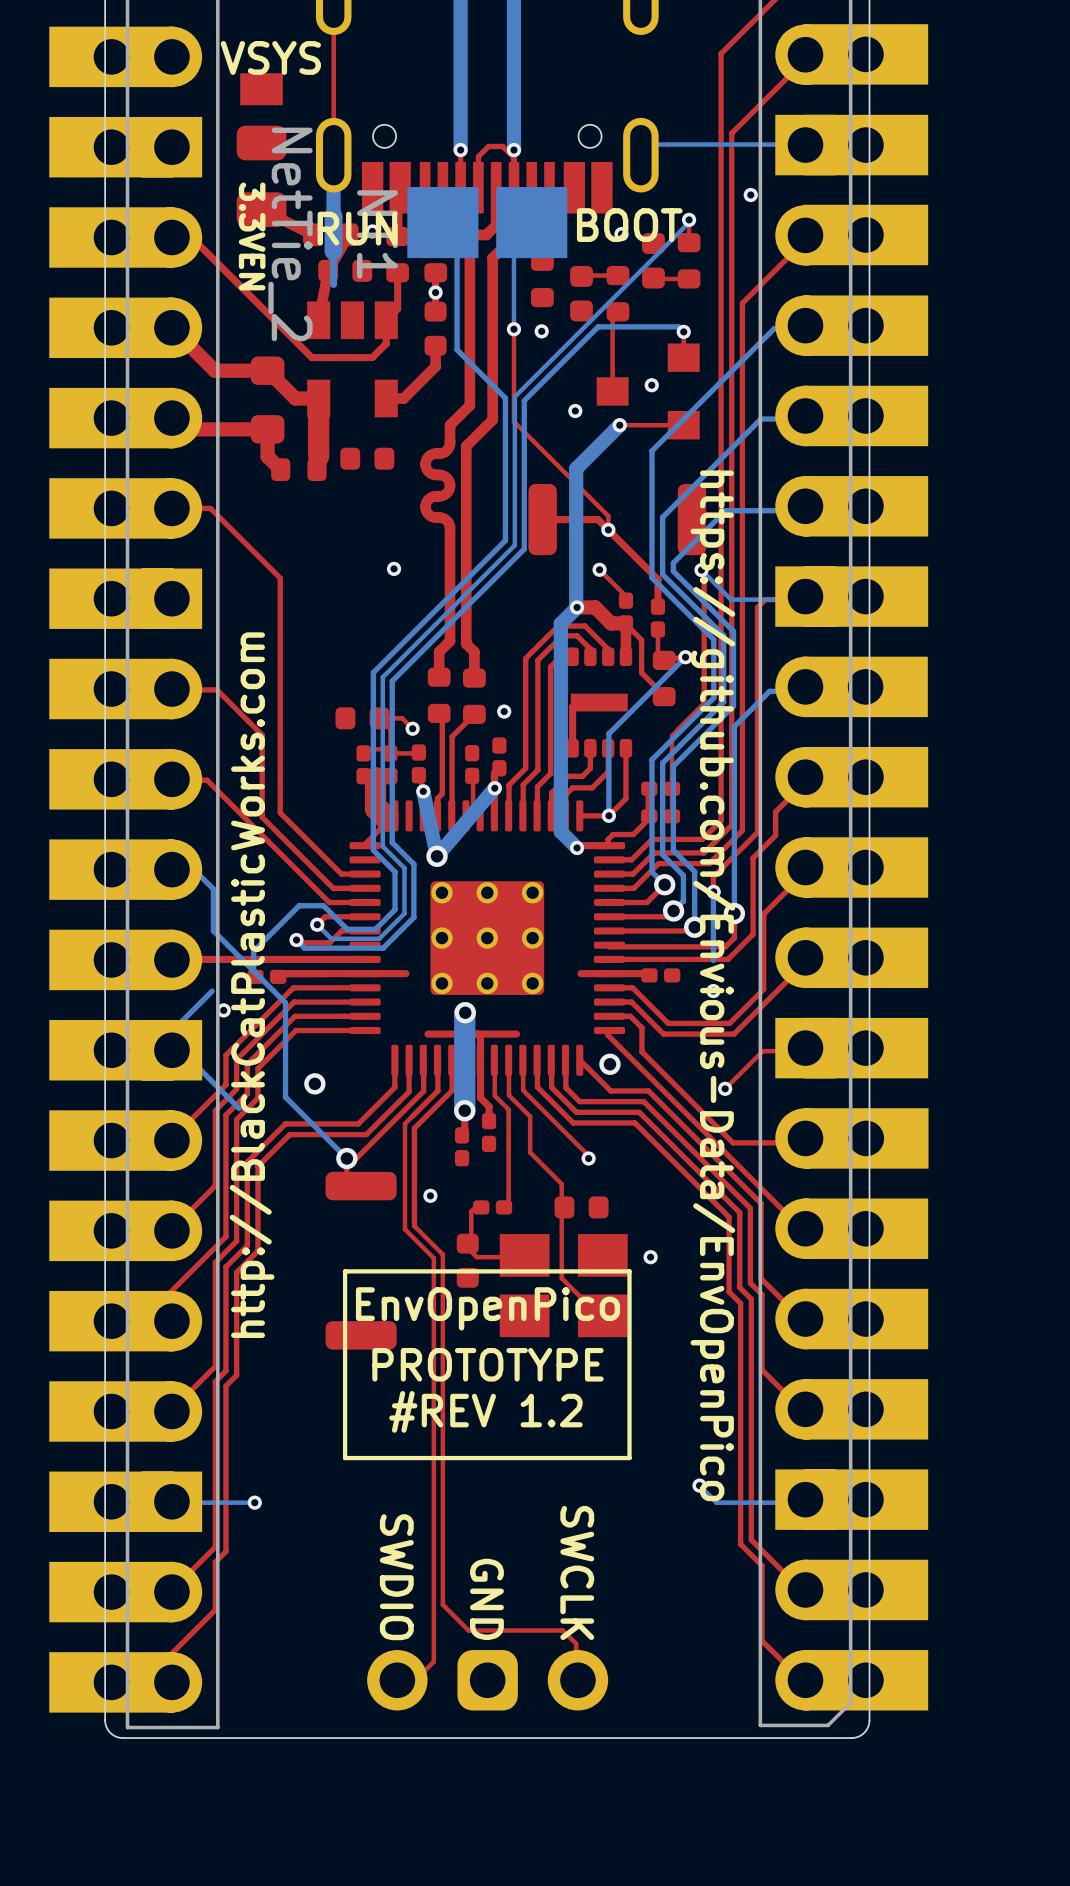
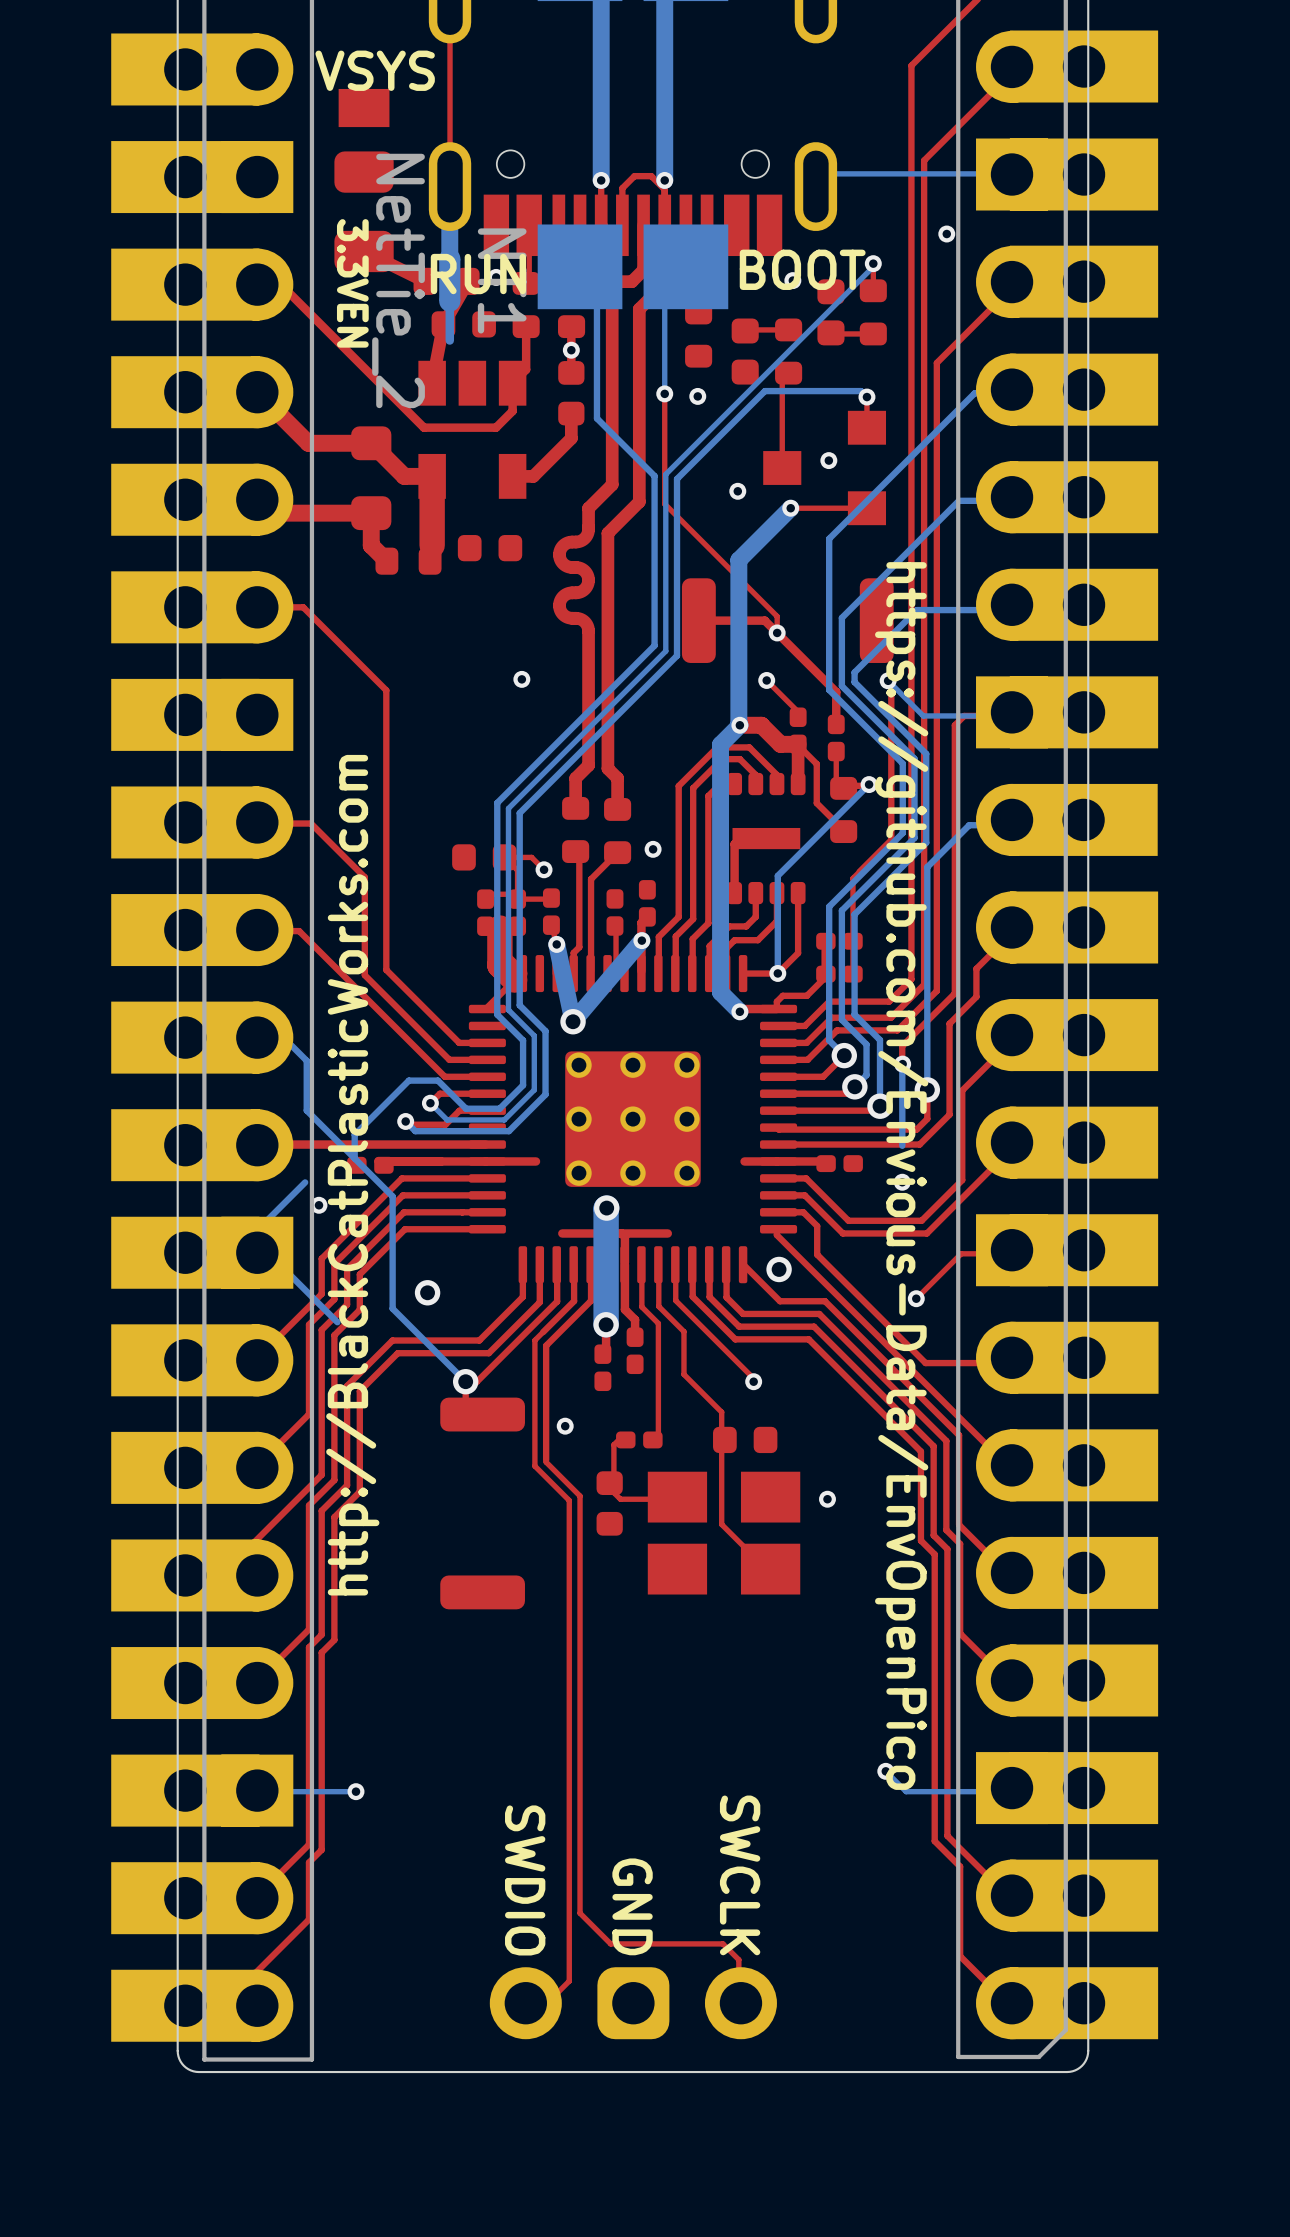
line: (629, 1271) (345, 1271) (345, 1458) (629, 1458) (629, 1271) -> none
text: EnvOpenPico (487, 1308) -> none
text: PROTOTYPE (487, 1364) -> none
text: #REV 1.2 (485, 1411) -> none

